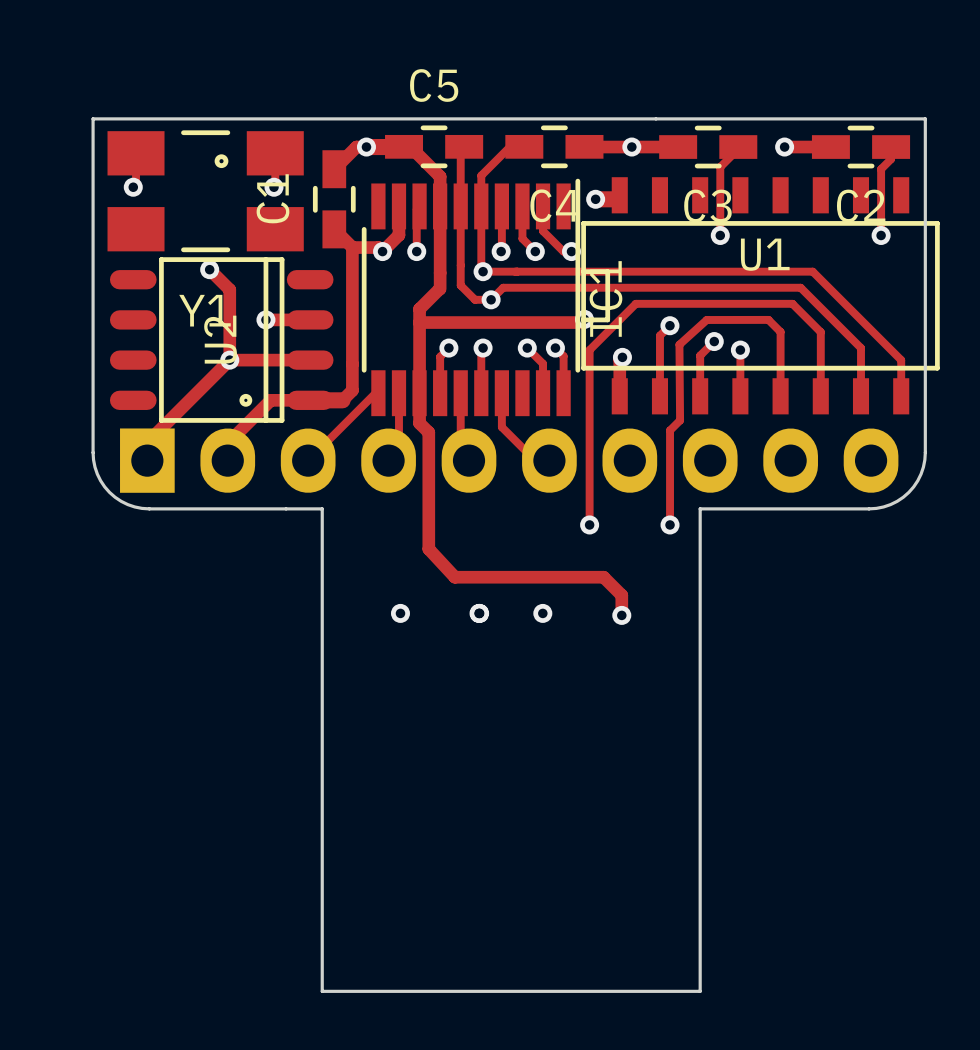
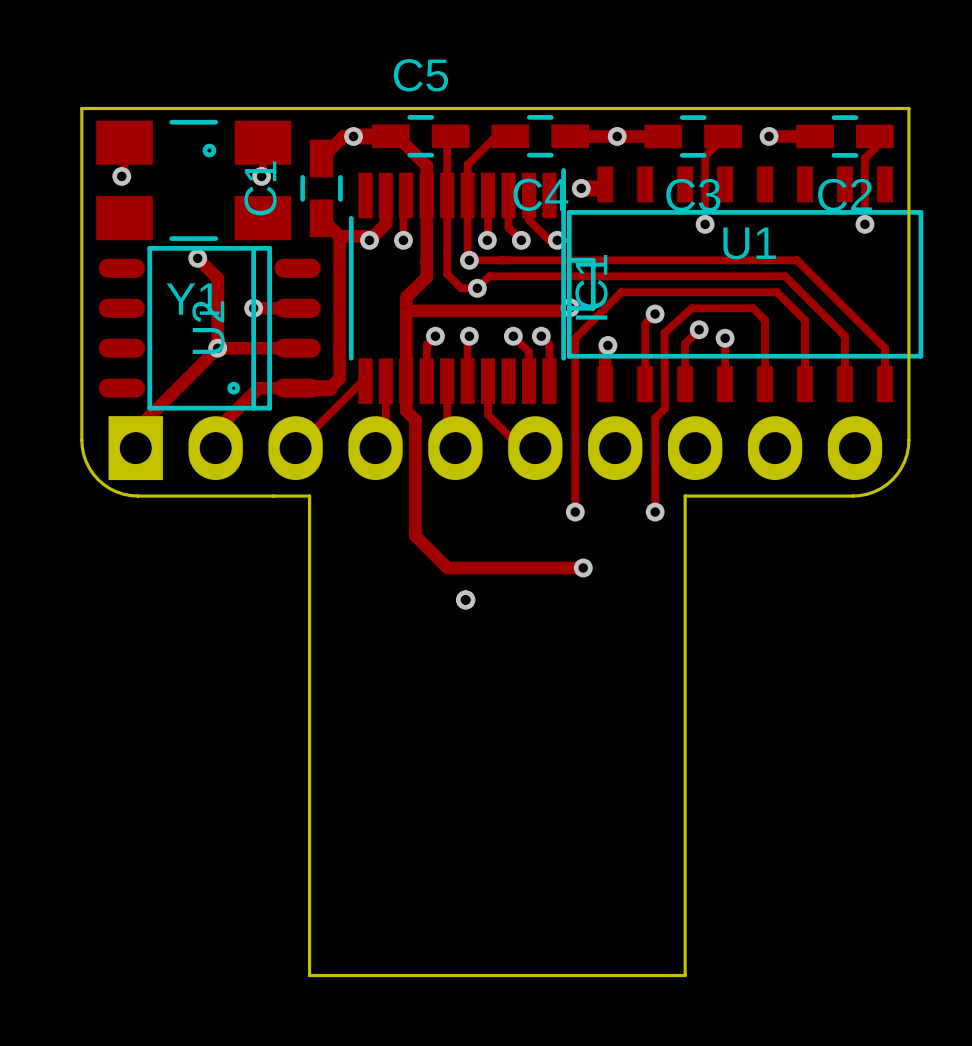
track: (428, 549) (454, 577) (603, 577) (621, 595) (621, 615) -> (415, 536) (447, 567) (583, 567)
via: none -> (583, 567)
via: (400, 613) -> none
via: (542, 613) -> none
via: (621, 615) -> none

